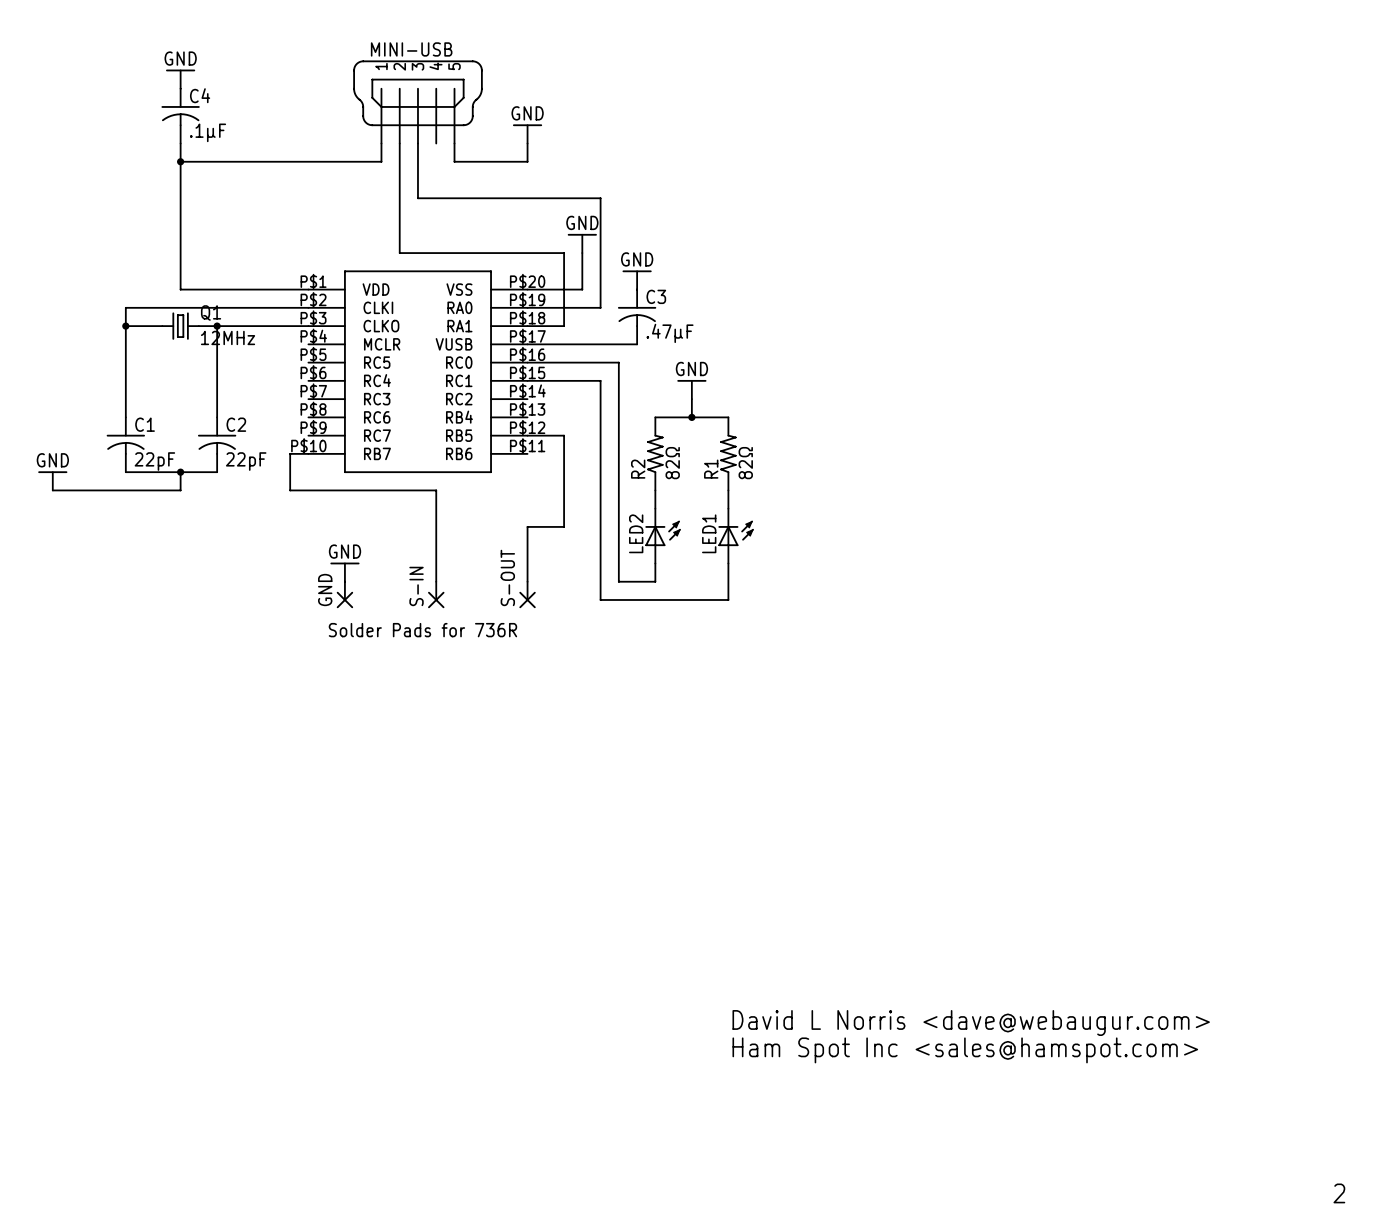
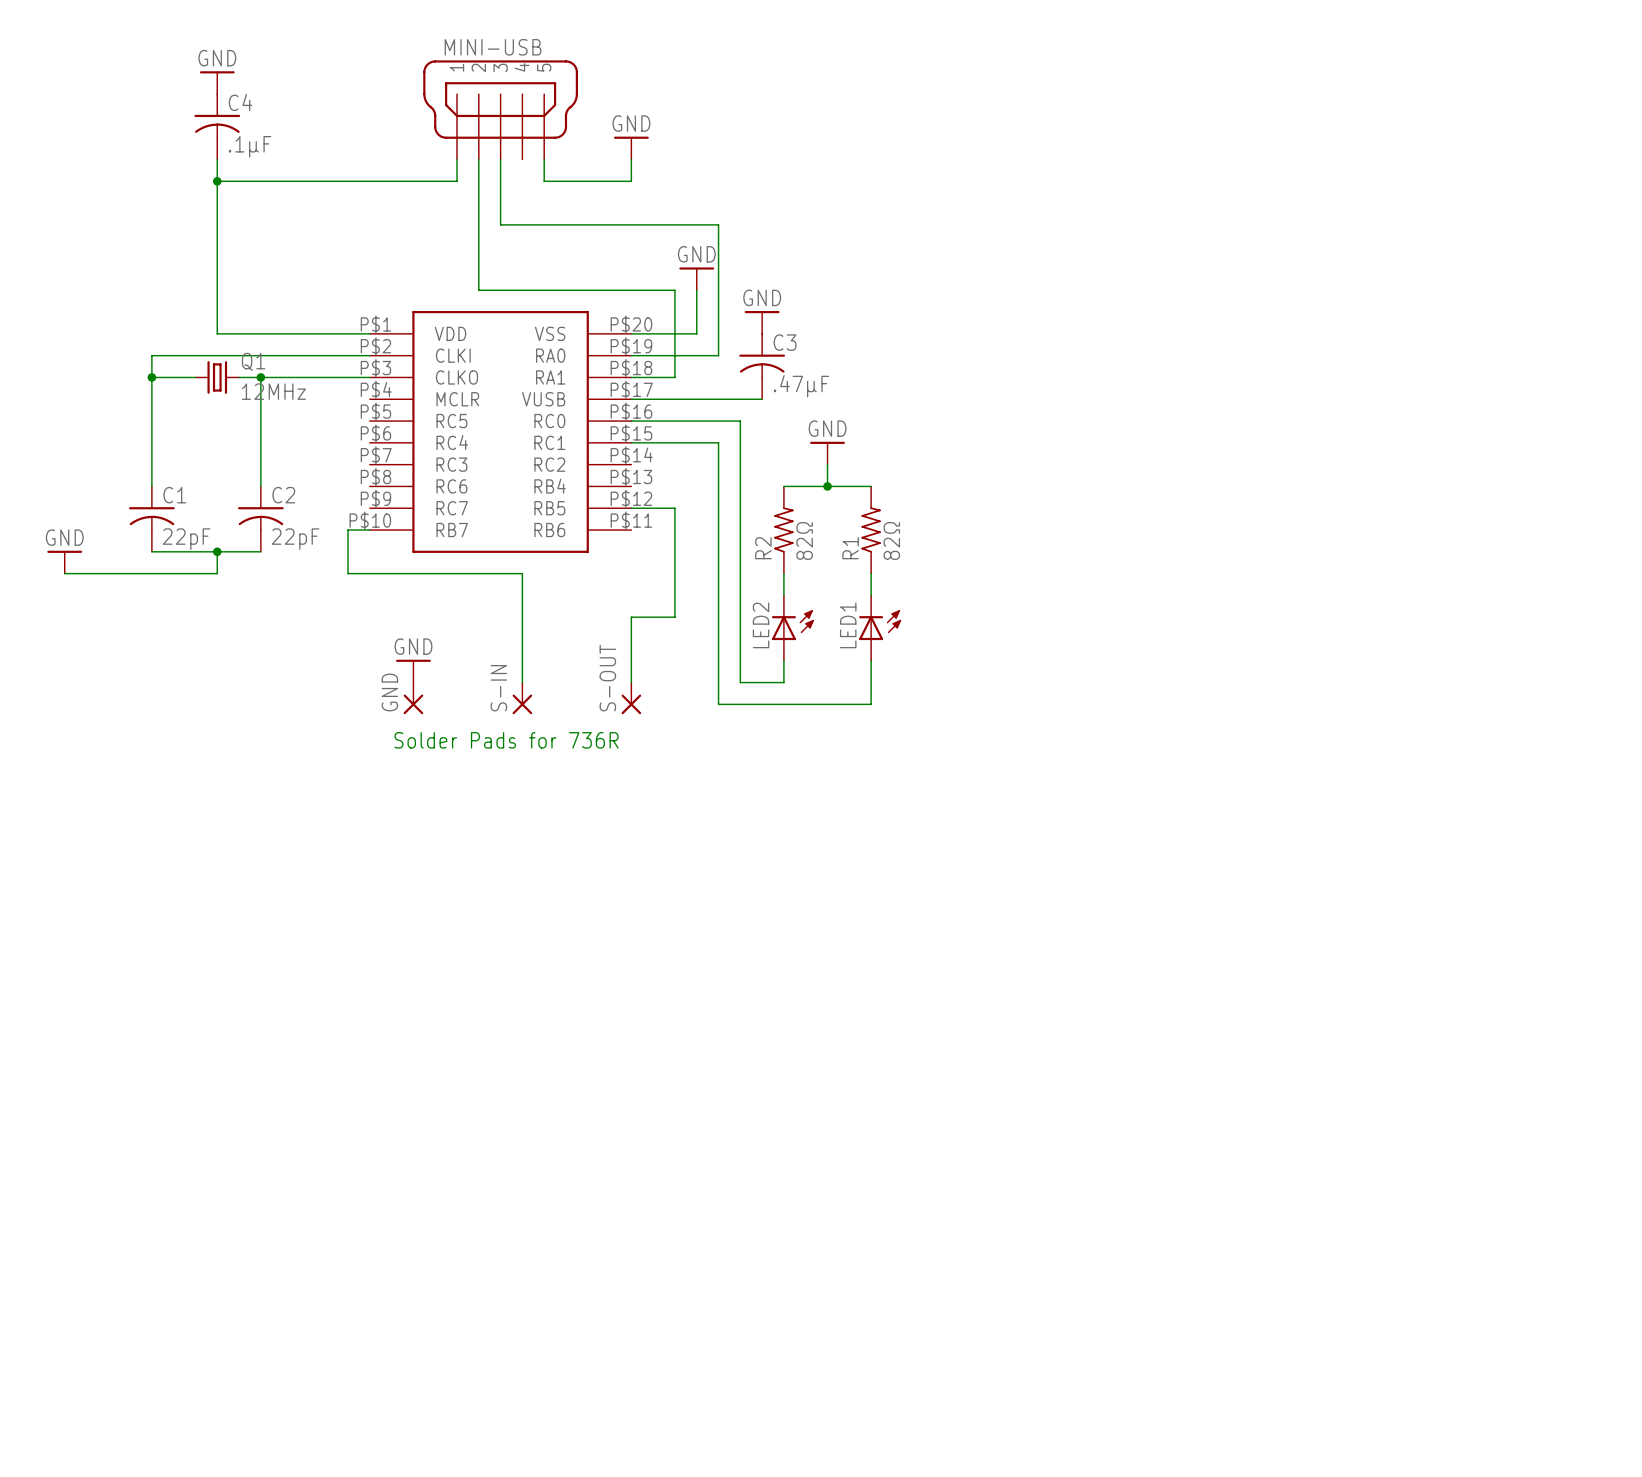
text: David L Norris <dave@webaugur.com> (971, 1023) -> none
text: Ham Spot Inc <sales@hamspot.com> (965, 1050) -> none
text: 2 (1339, 1193) -> none

